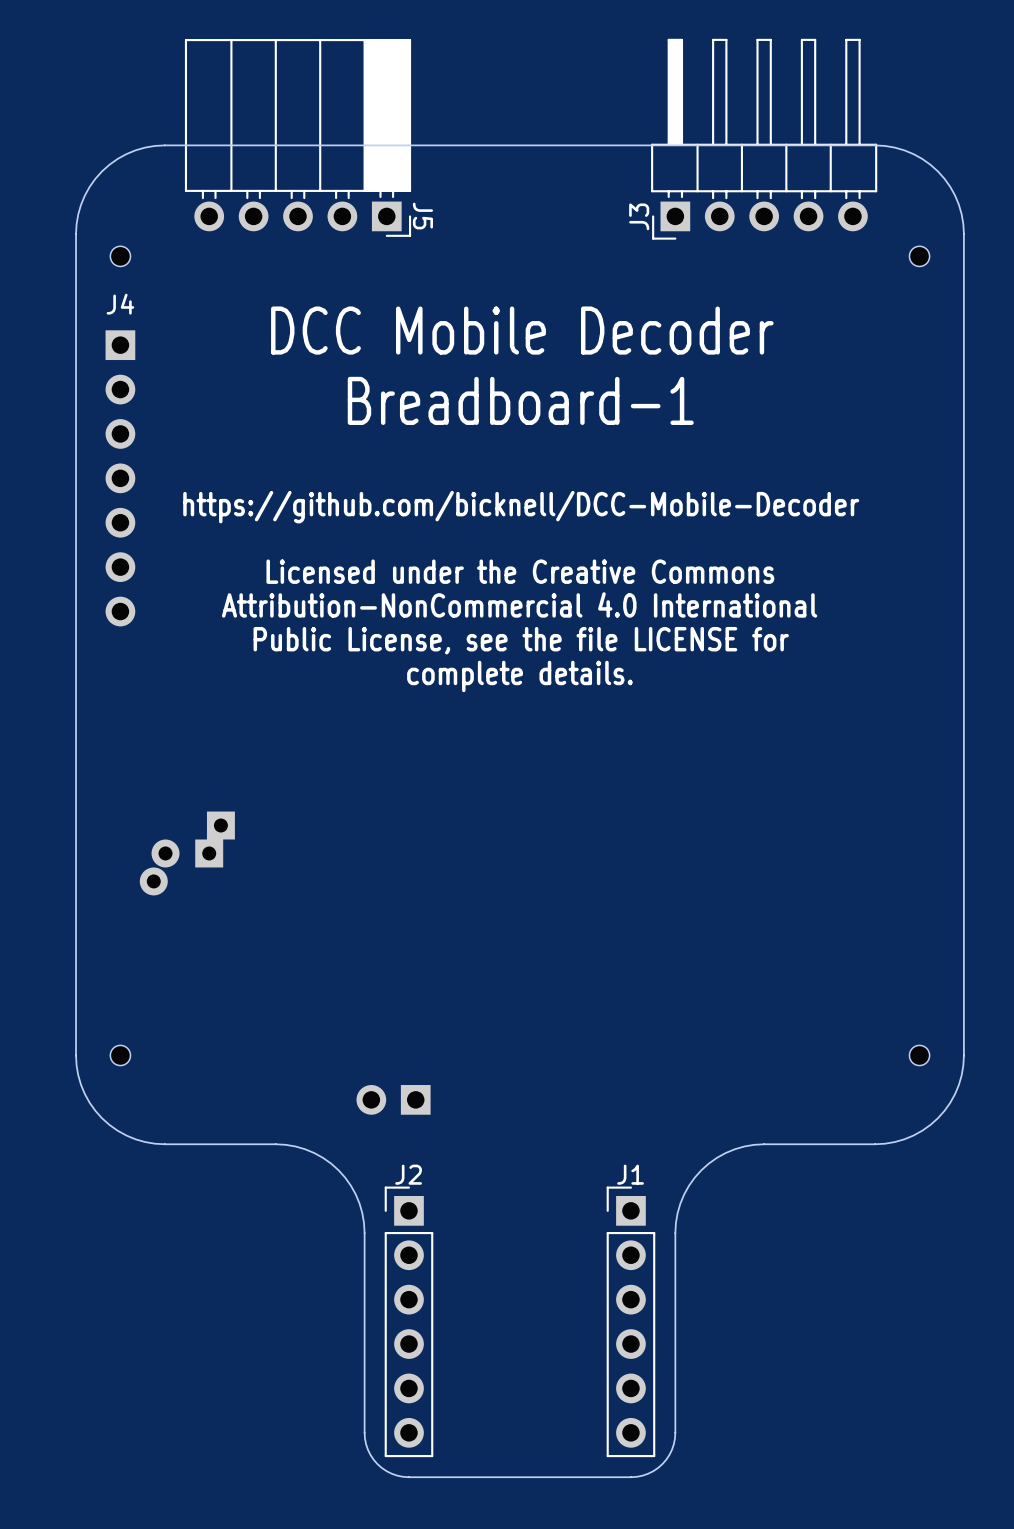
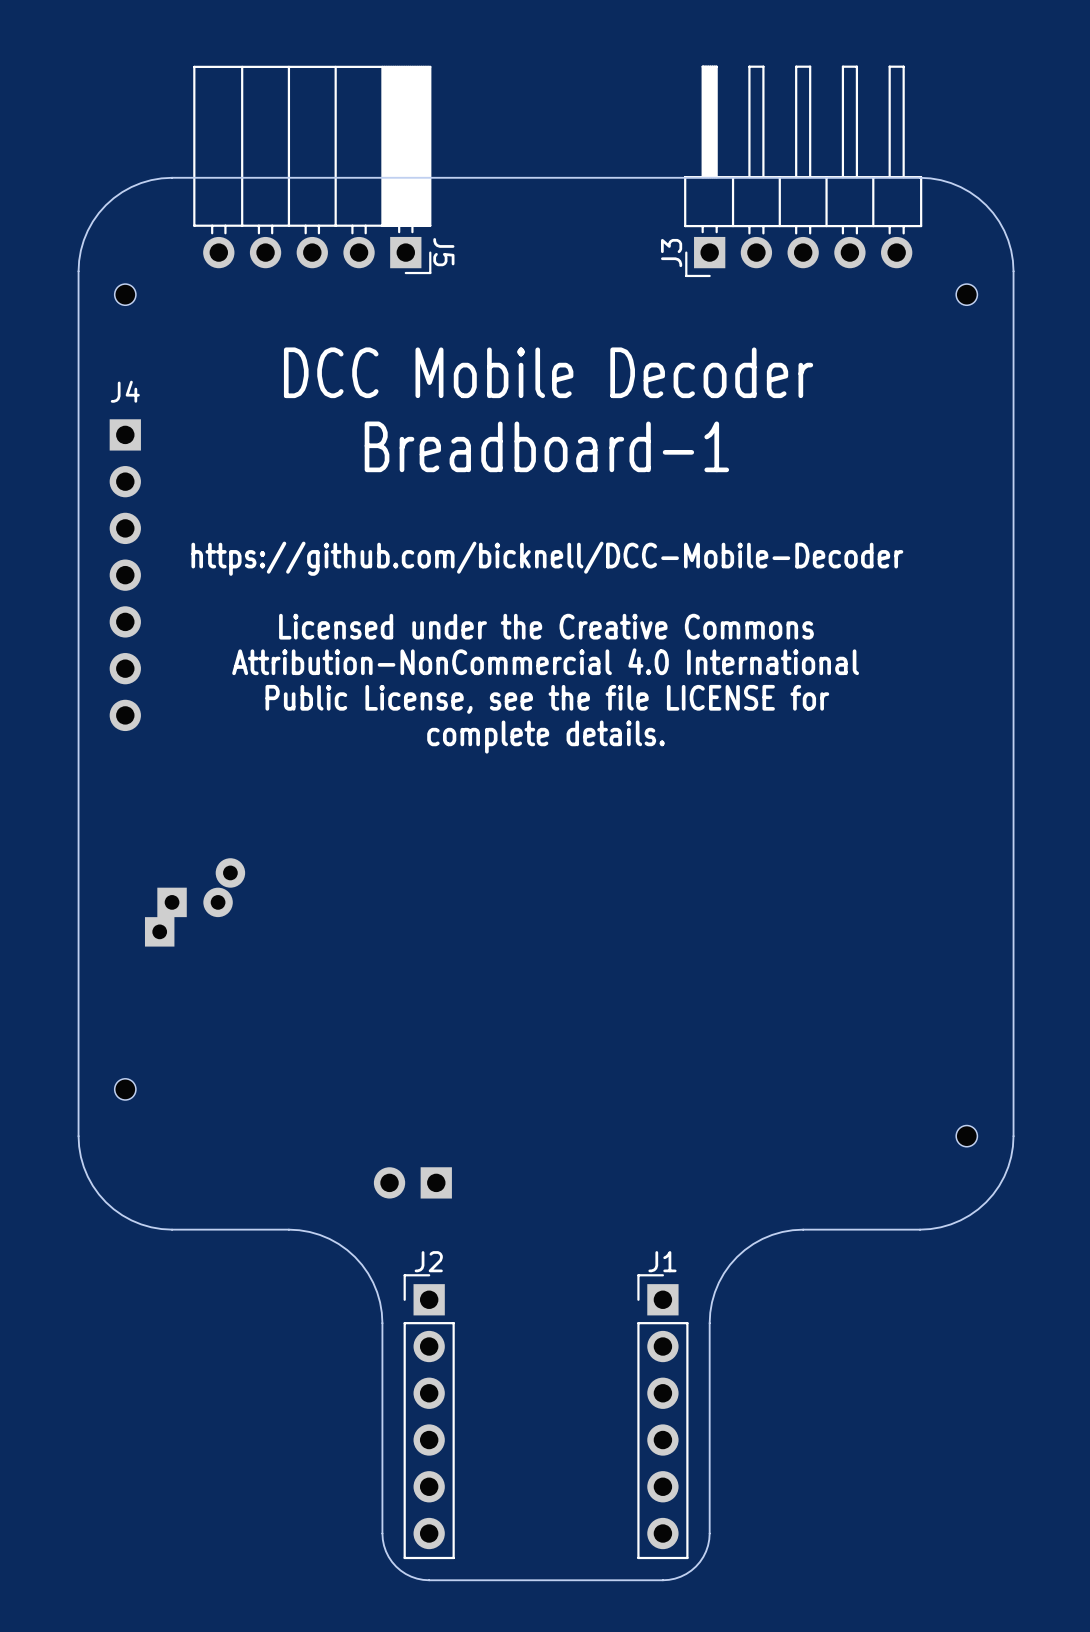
J4 position: (120, 478) -> (125, 575)
part rotation: 0° (187, 853) -> 180° (195, 902)
part position: (120, 1055) -> (125, 1089)

